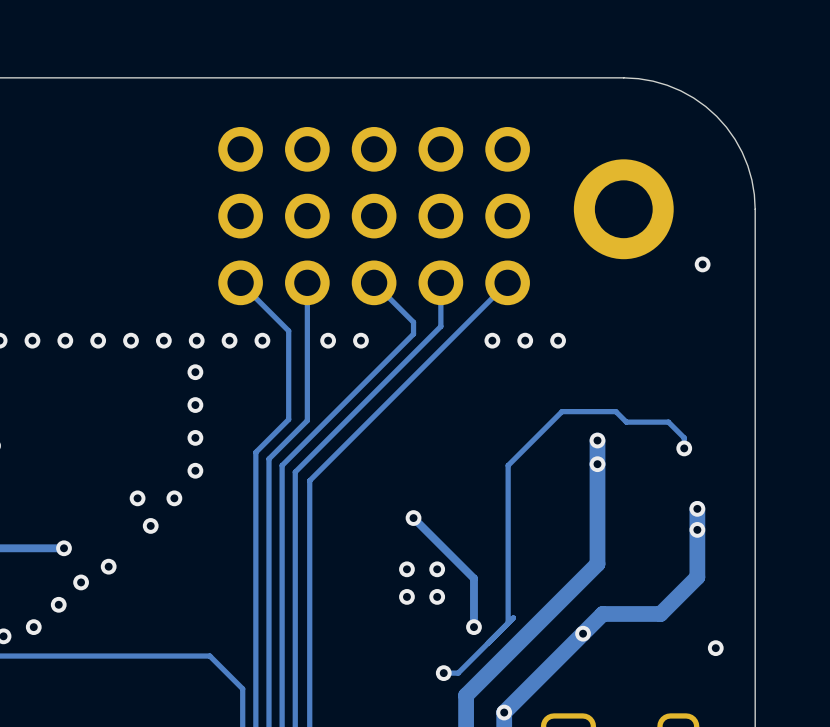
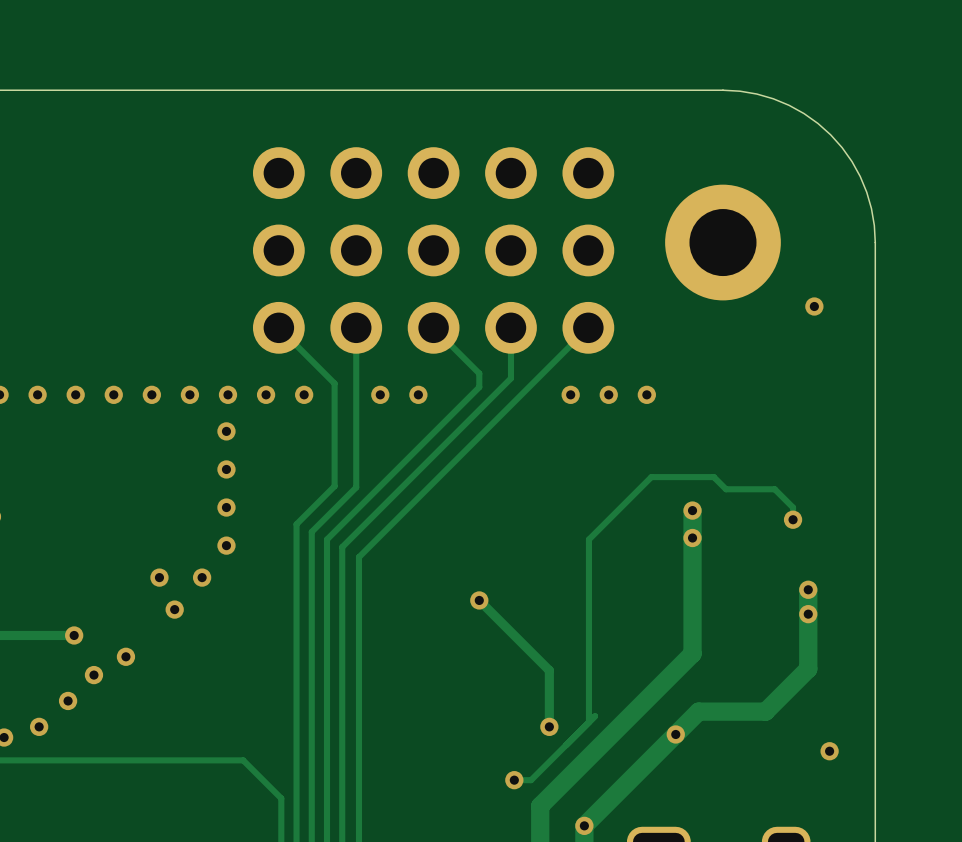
via: (406, 569) -> none
via: (437, 569) -> none
via: (406, 596) -> none
via: (437, 596) -> none

